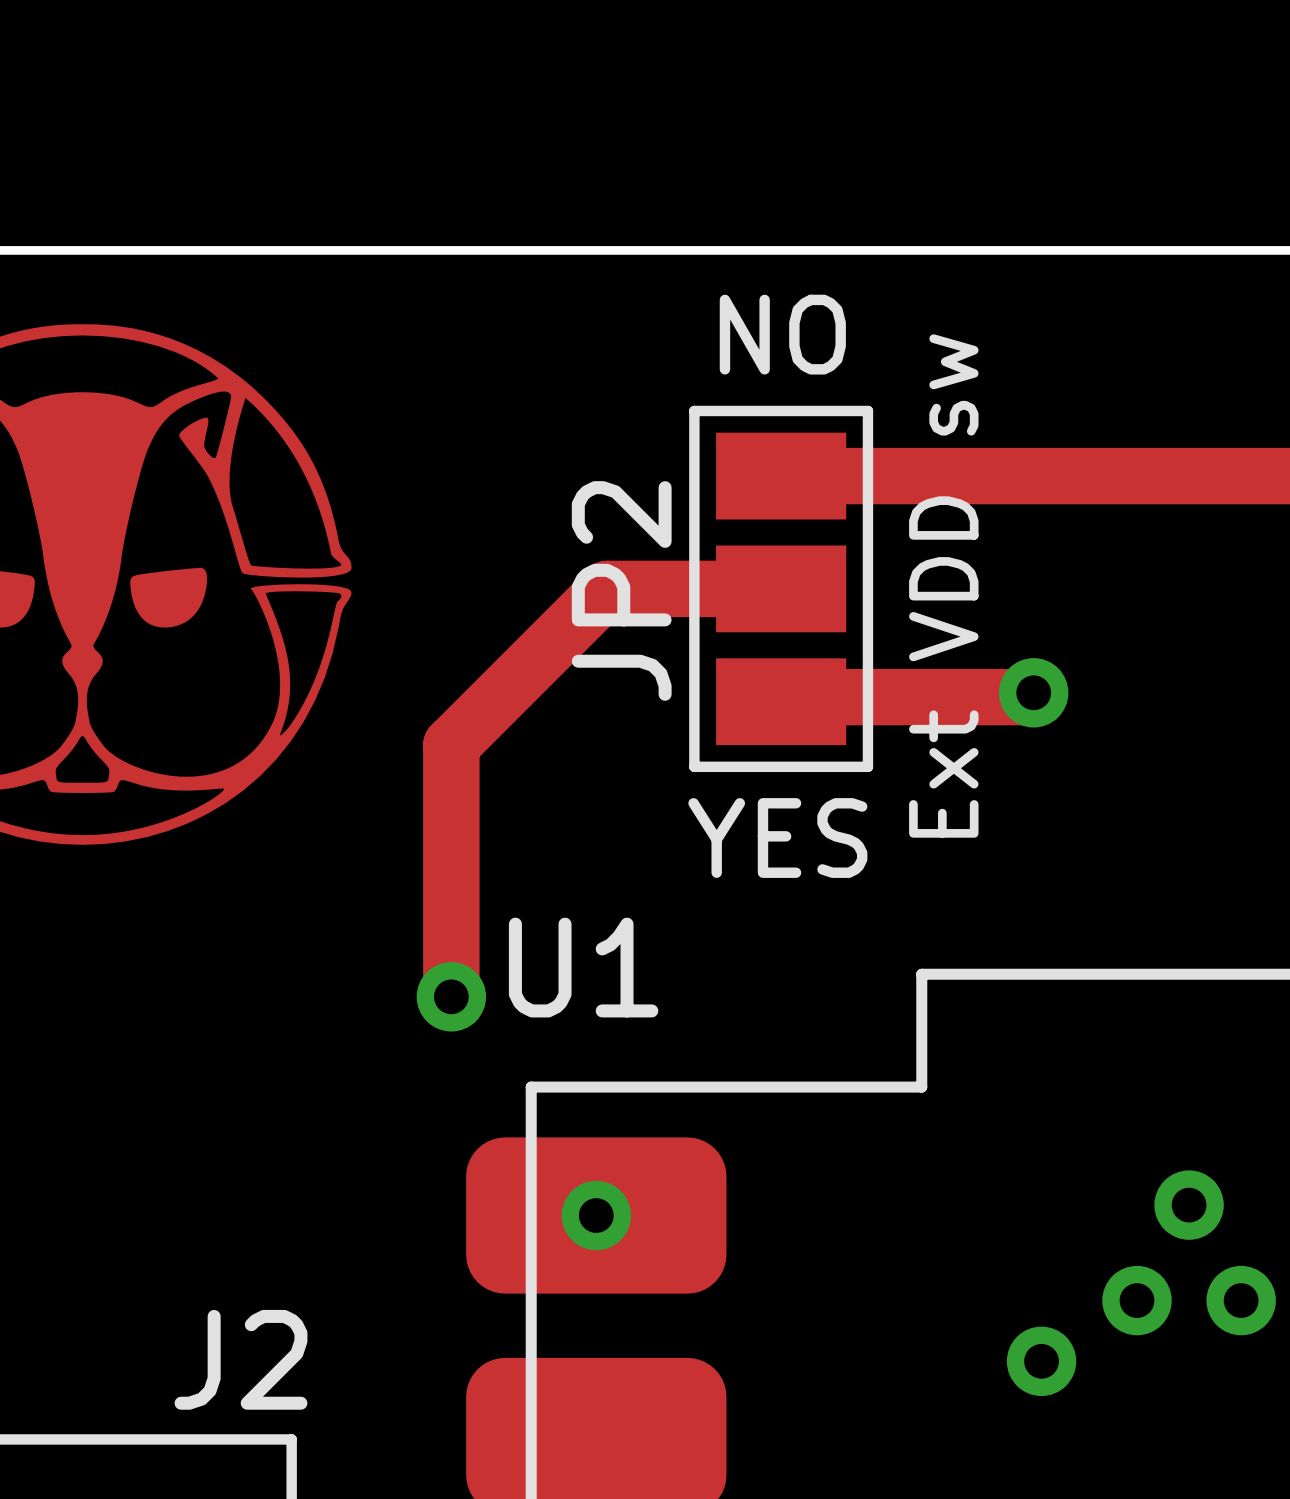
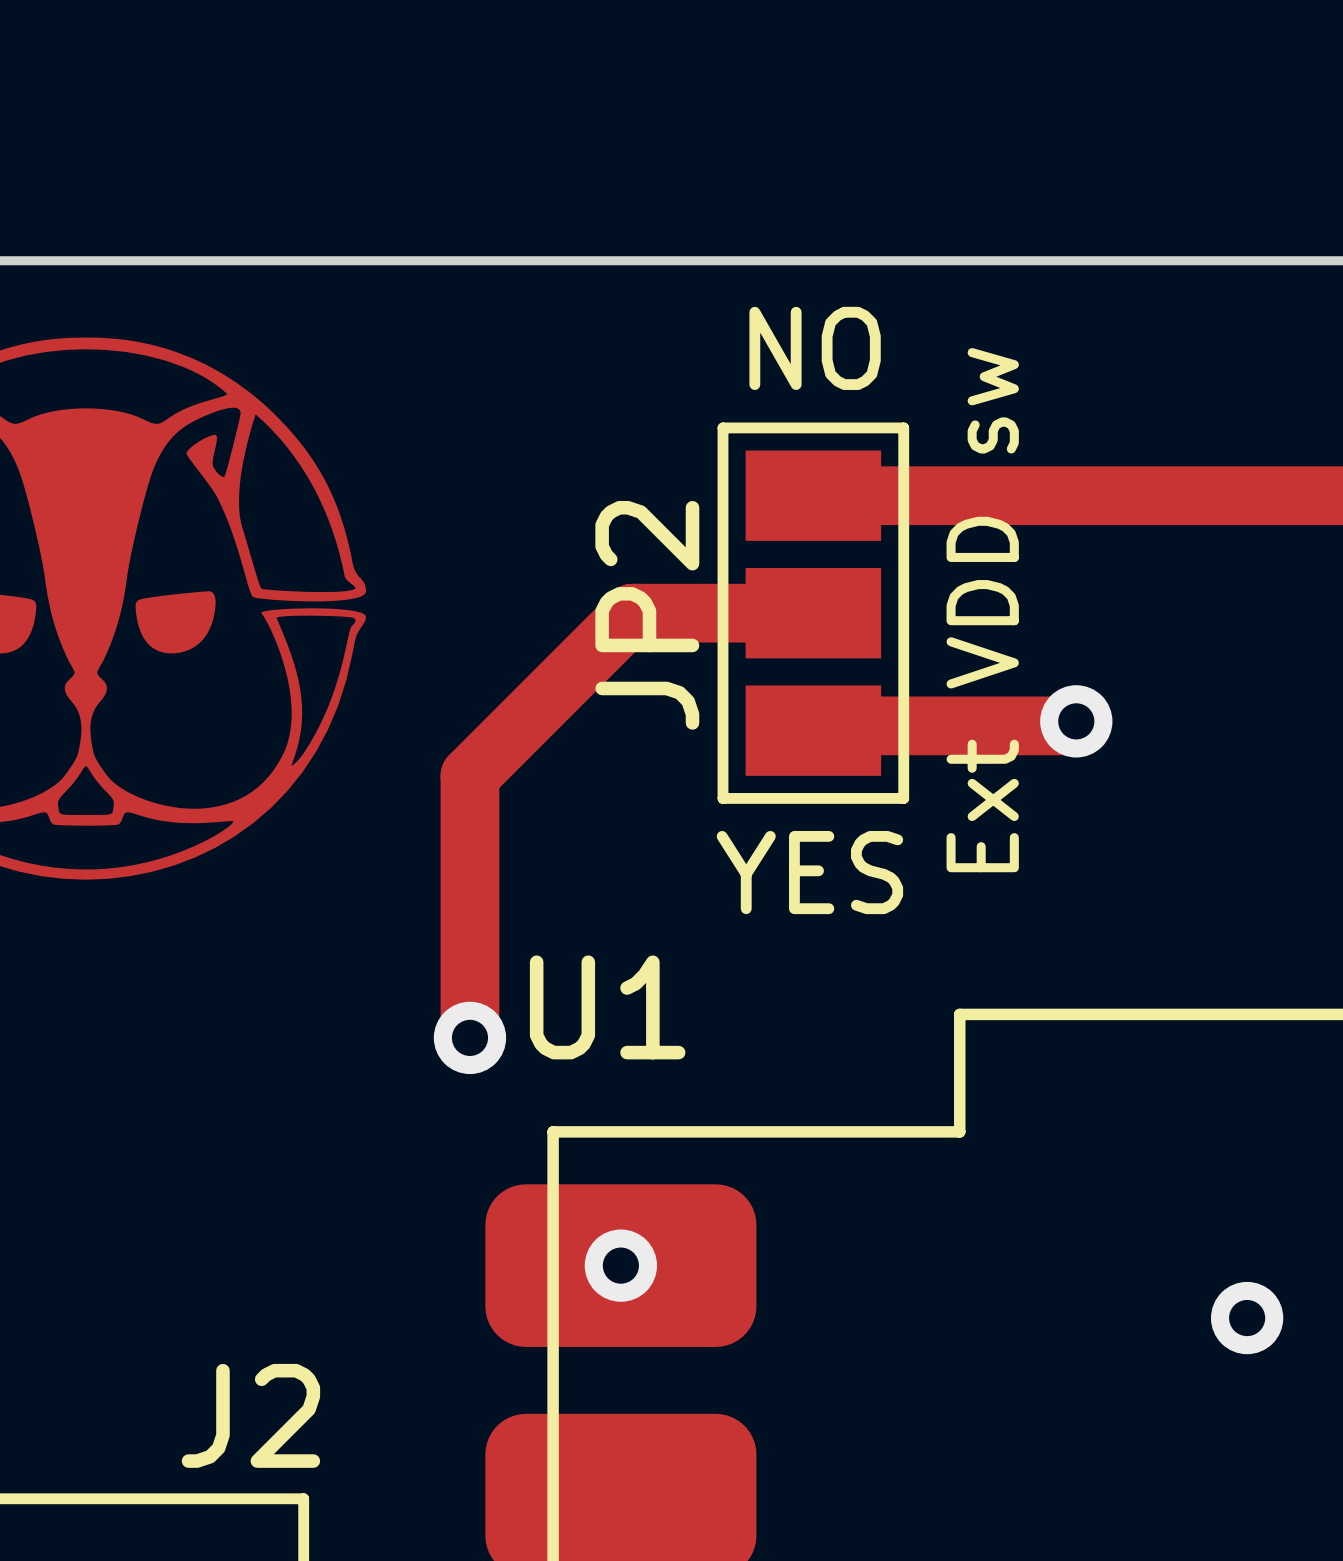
via: (1189, 1205) -> none
via: none -> (1247, 1318)
via: (1137, 1300) -> none
via: (1241, 1300) -> none
via: (1041, 1361) -> none

